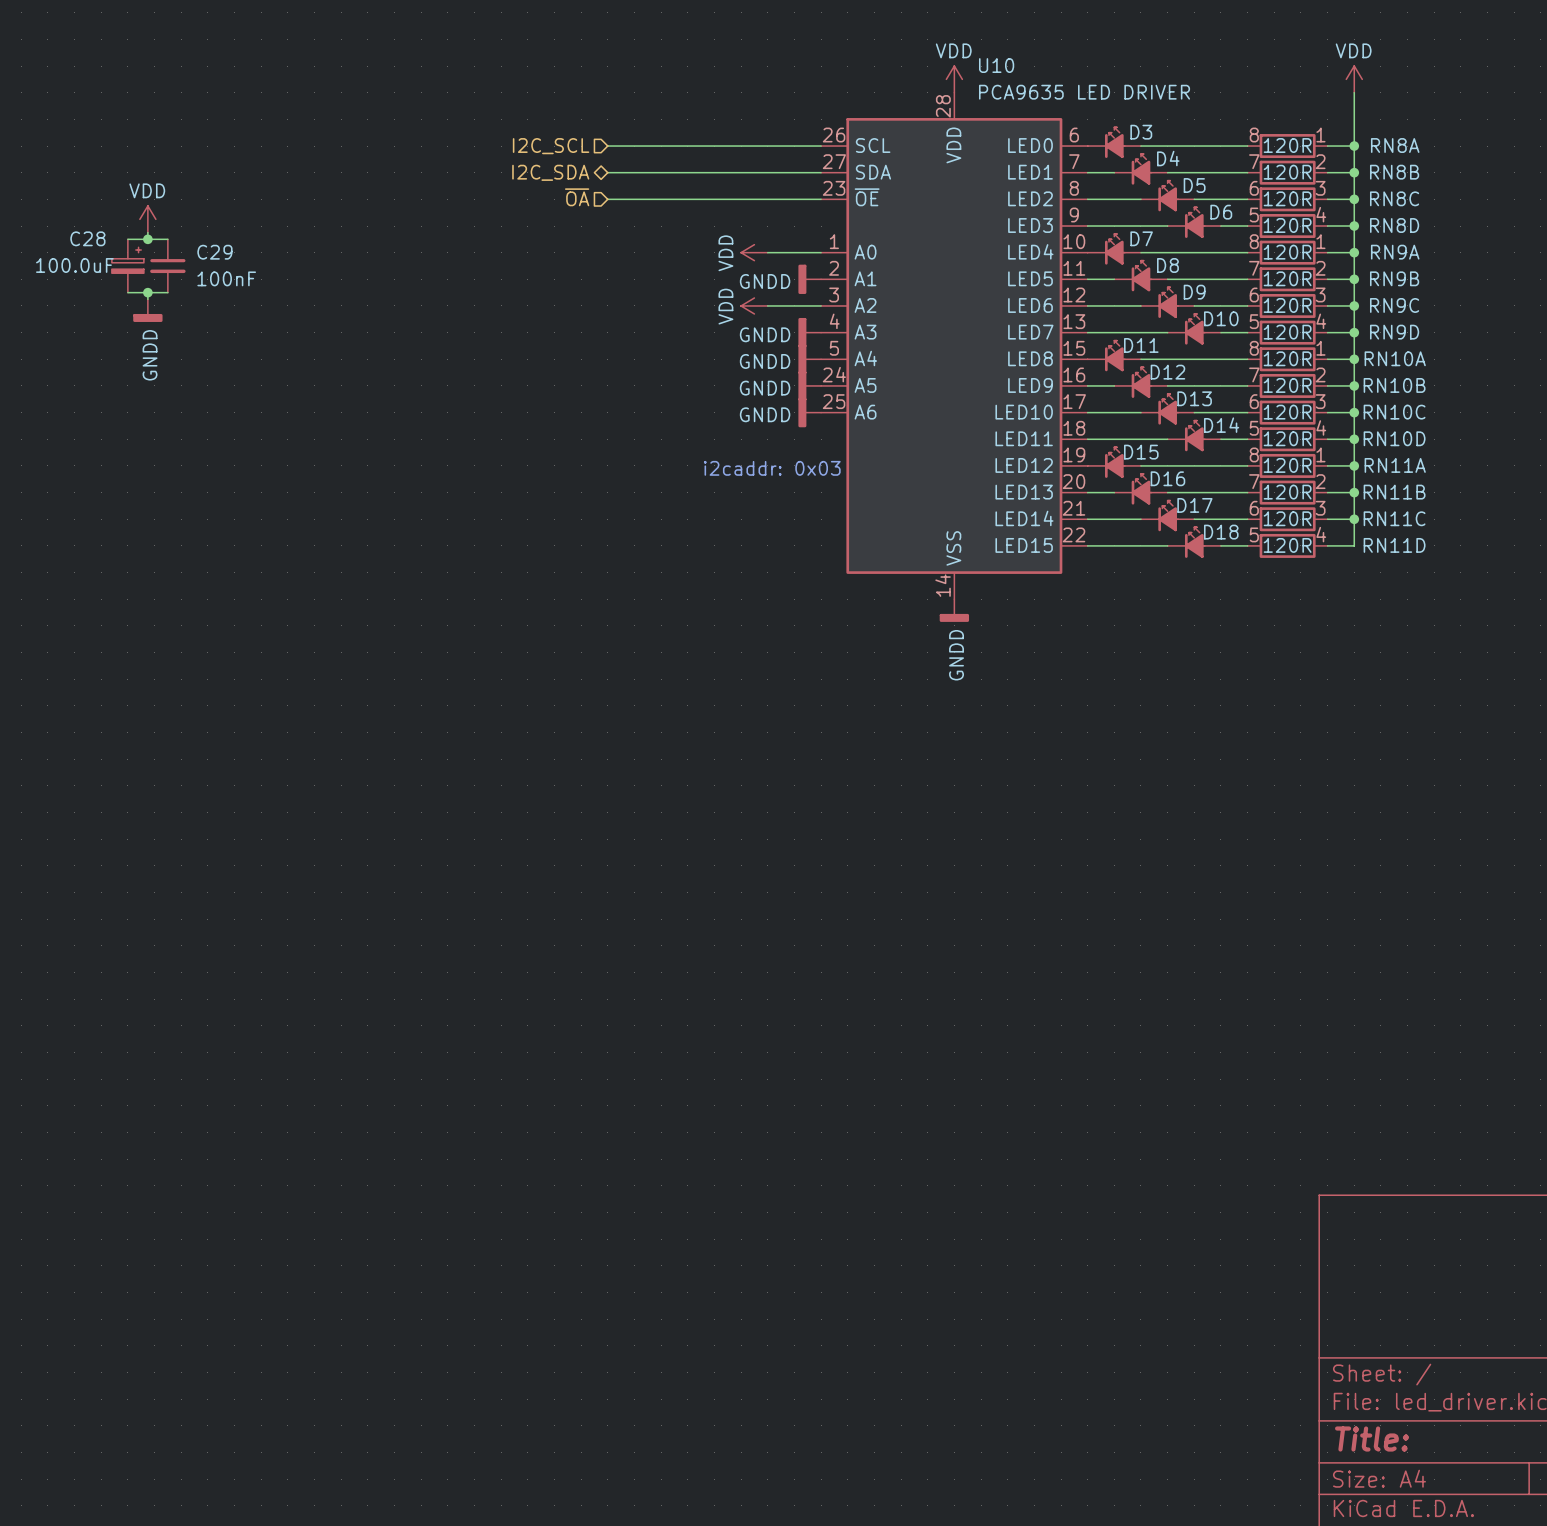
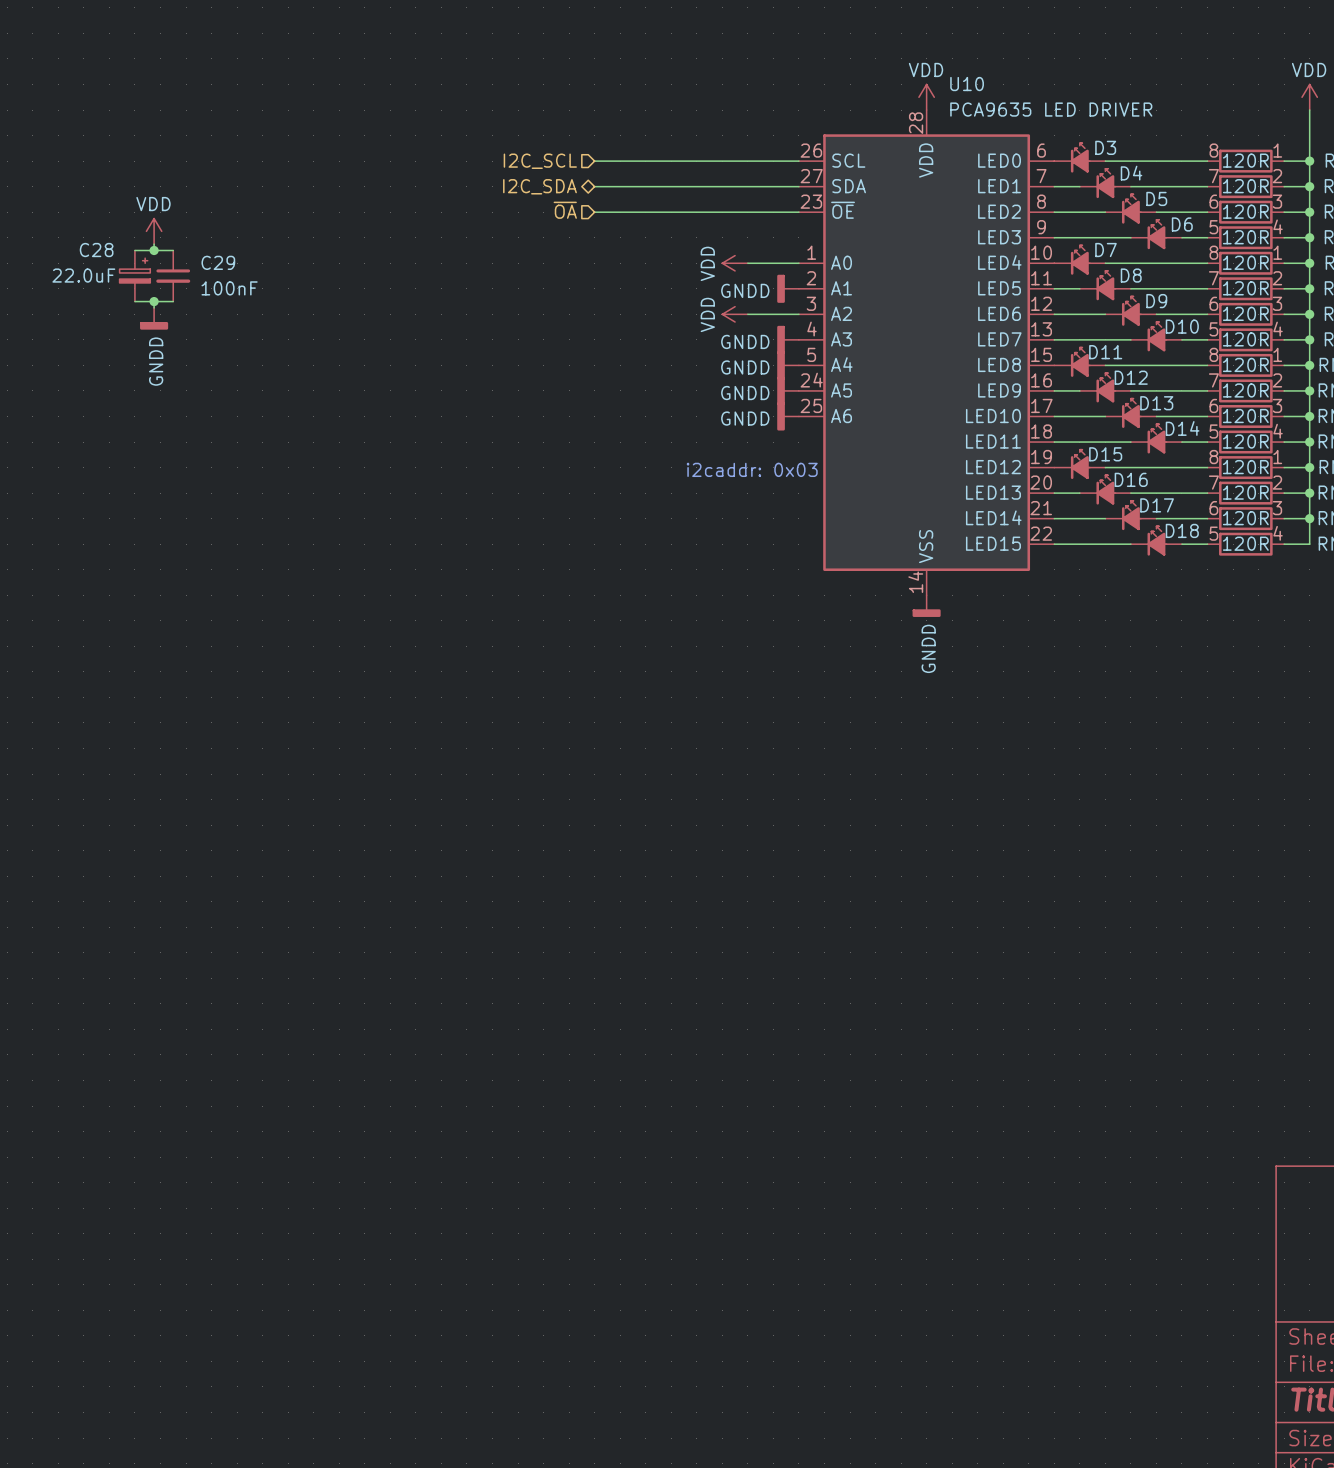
C28 value: 100.0uF (74, 265) -> 22.0uF (83, 275)

